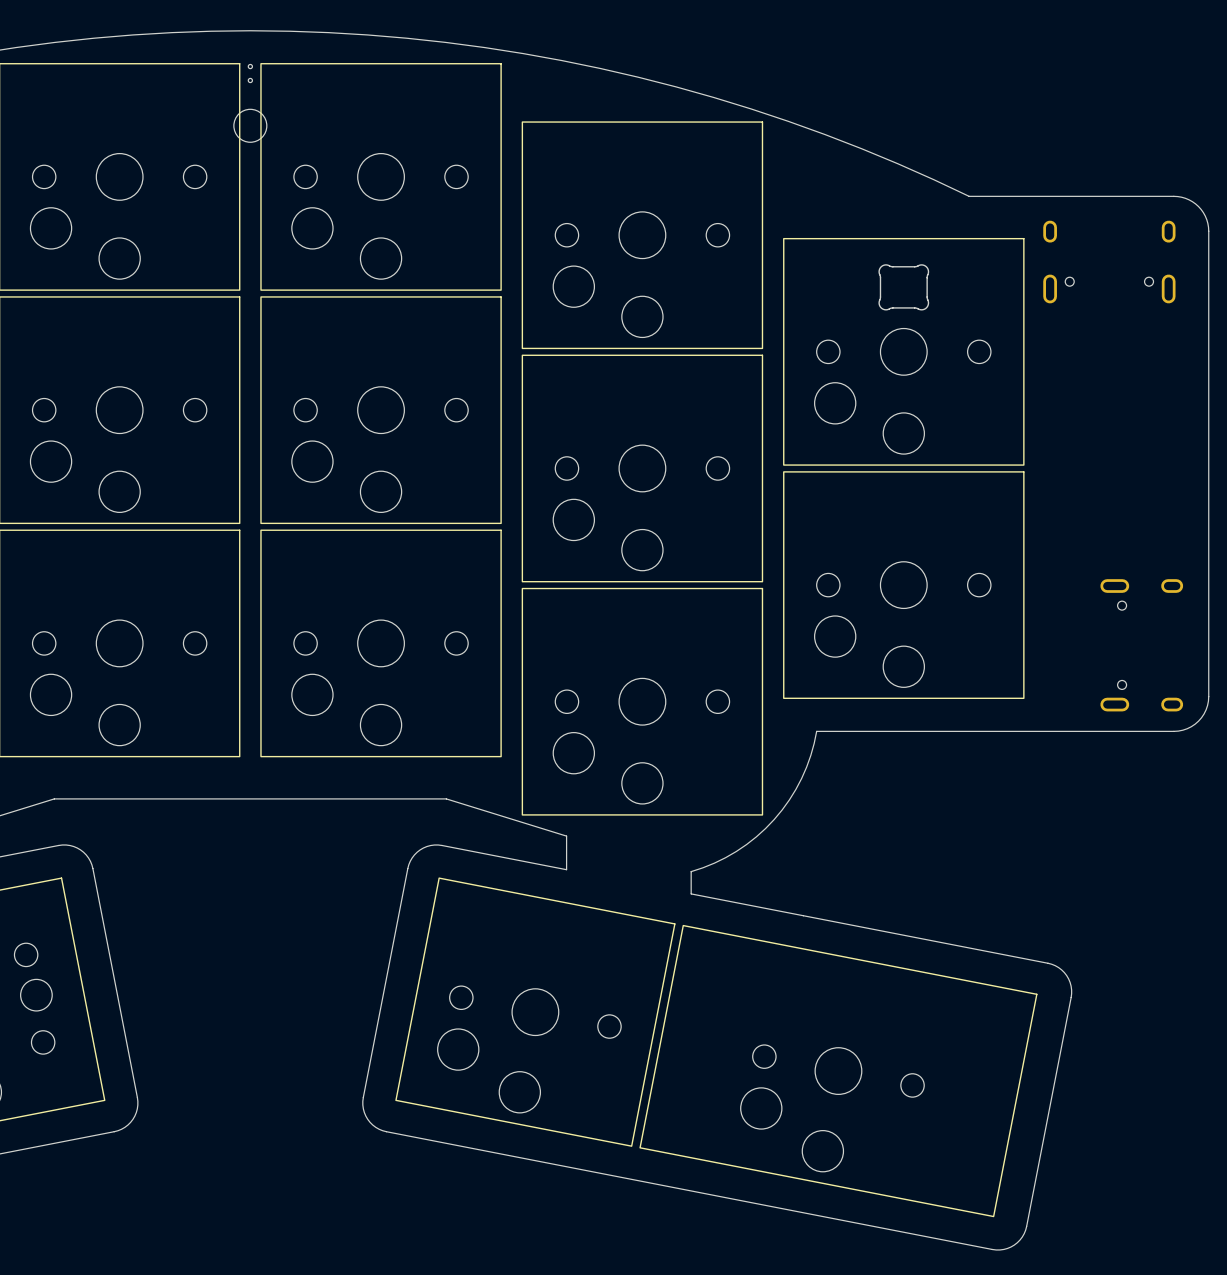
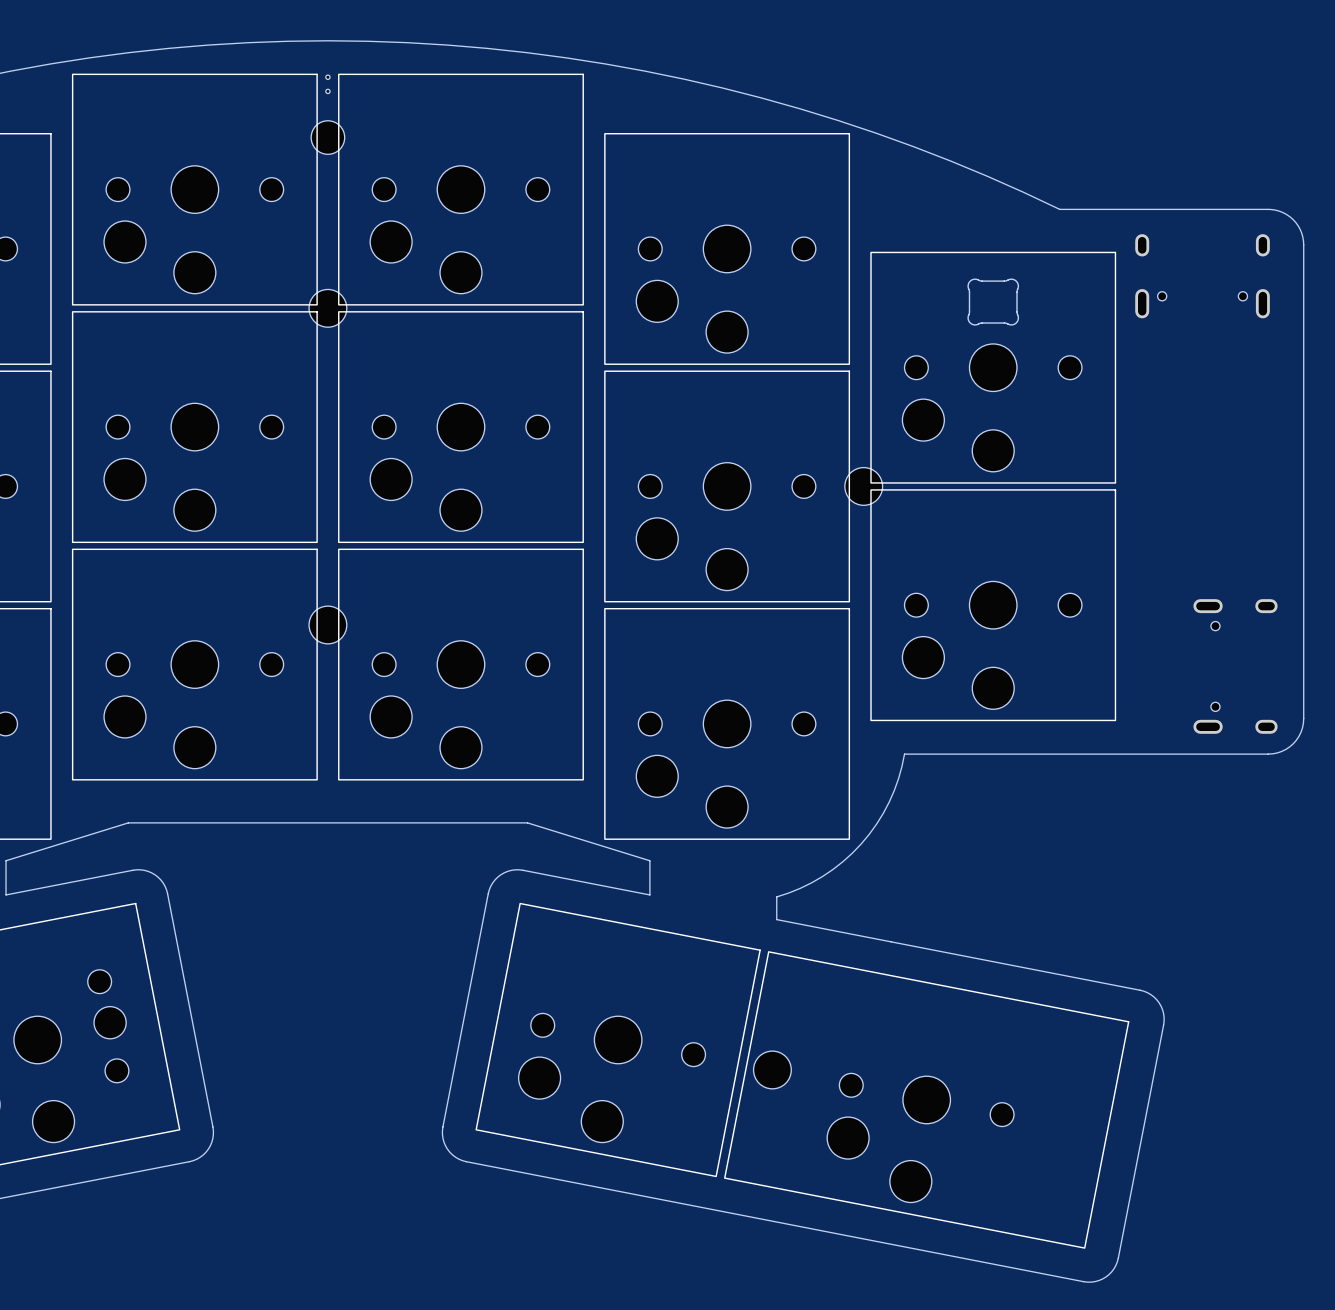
part: none -> (327, 308)
part: none -> (863, 486)
part: none -> (327, 624)
part: none -> (772, 1069)

